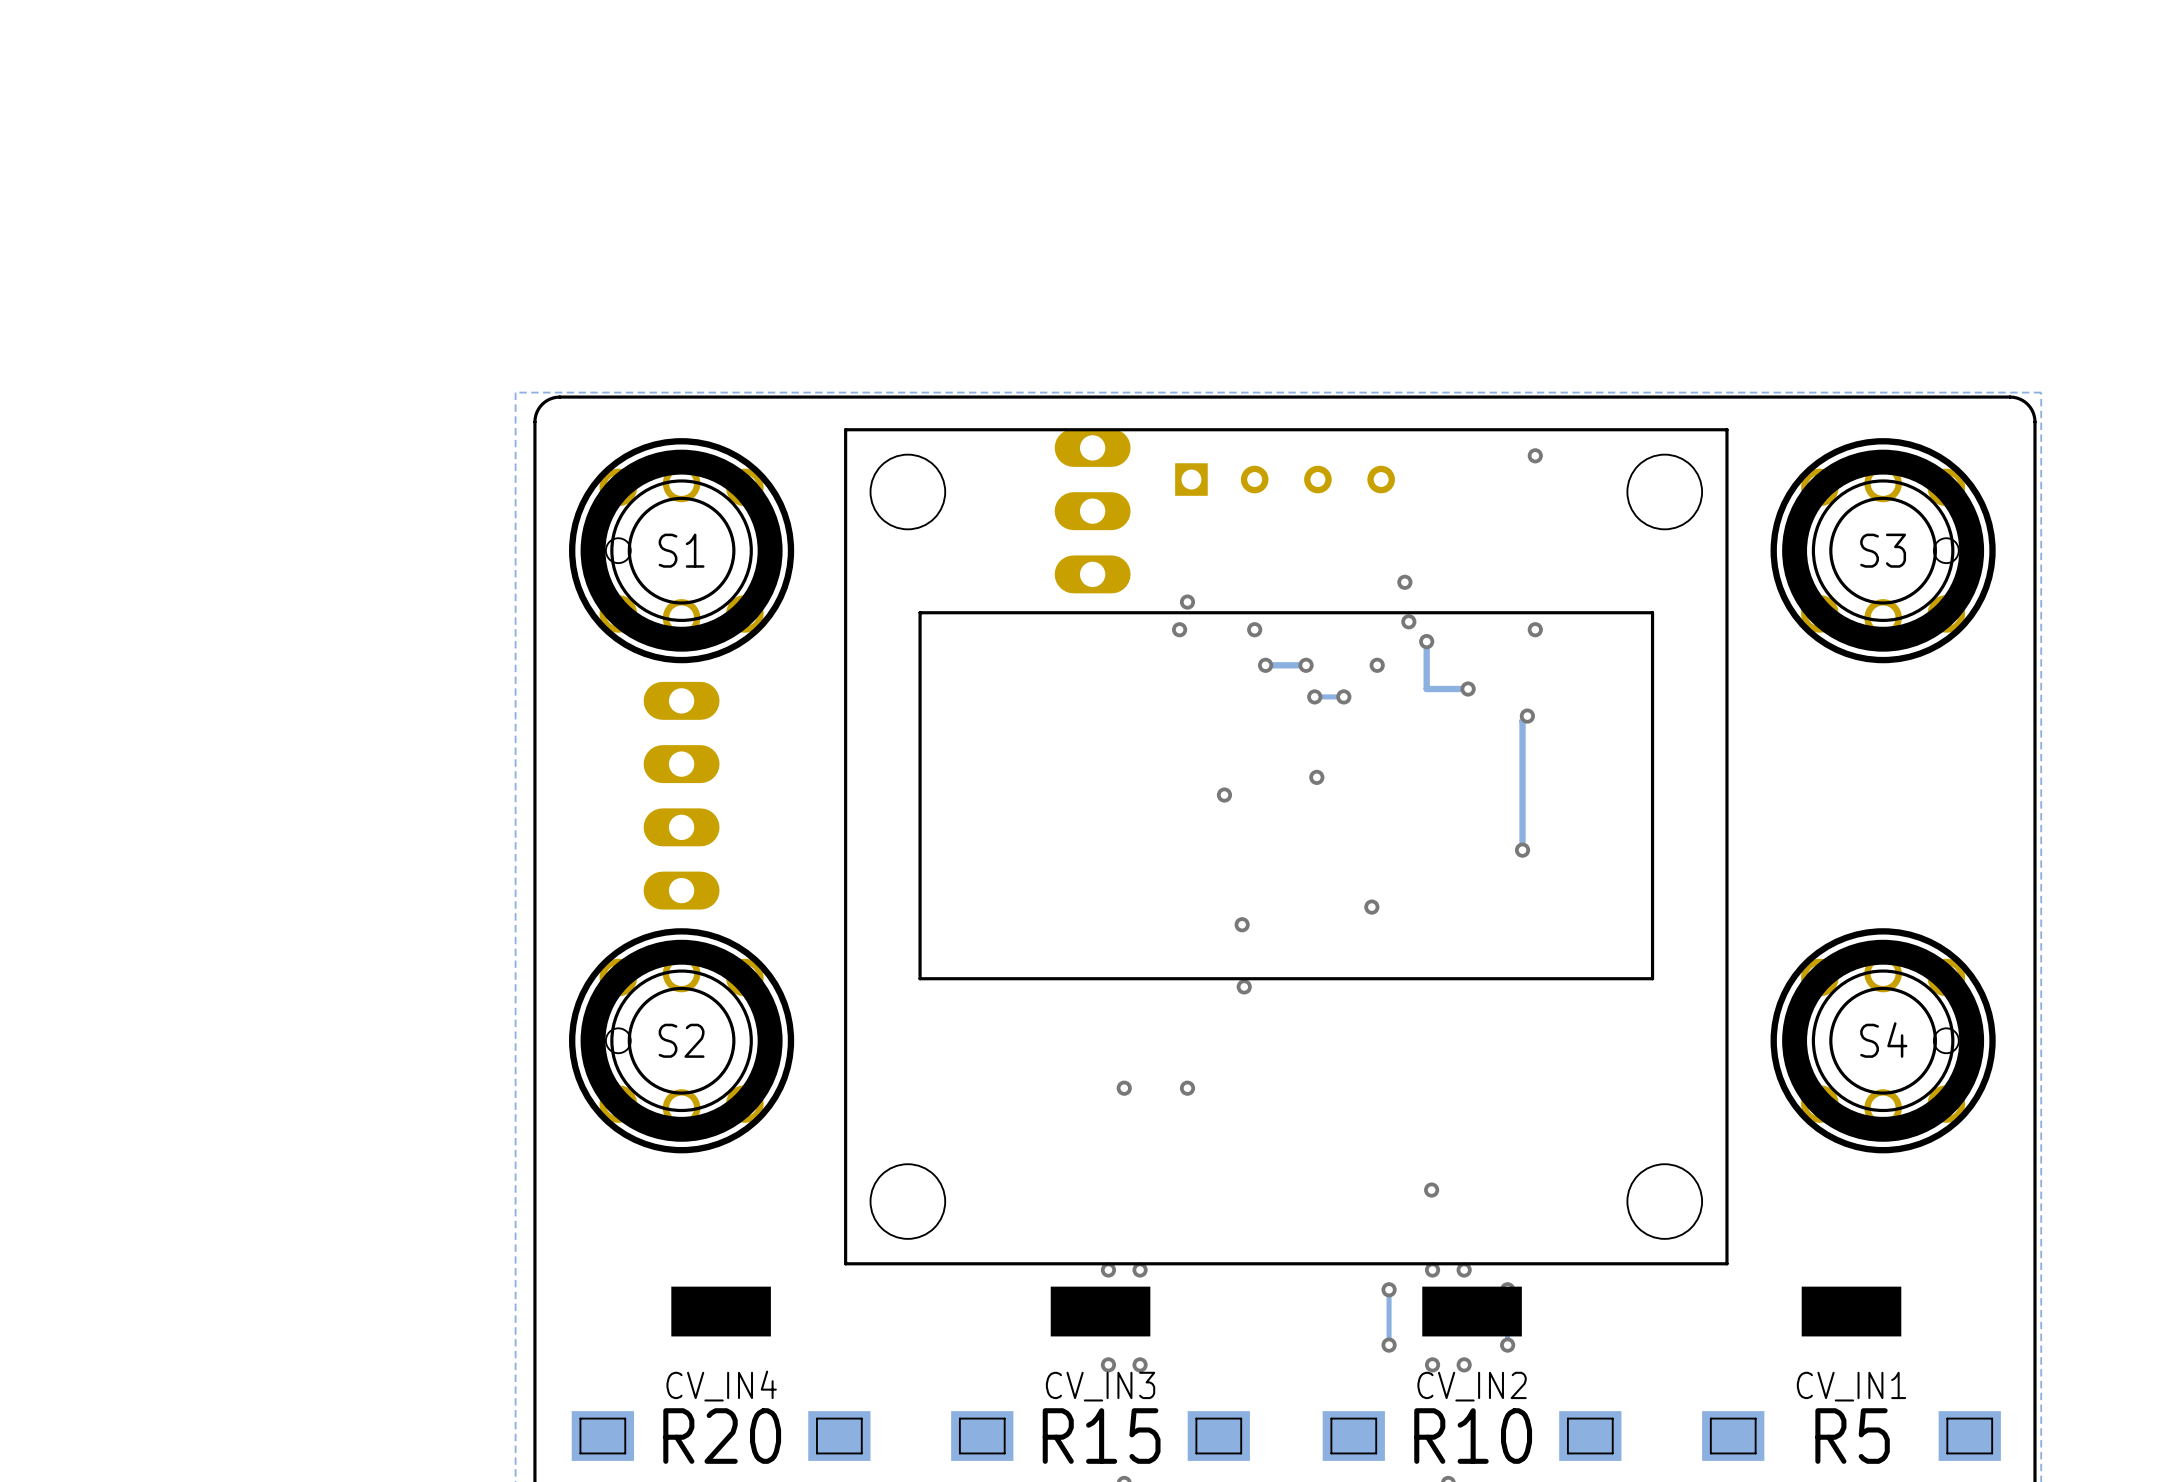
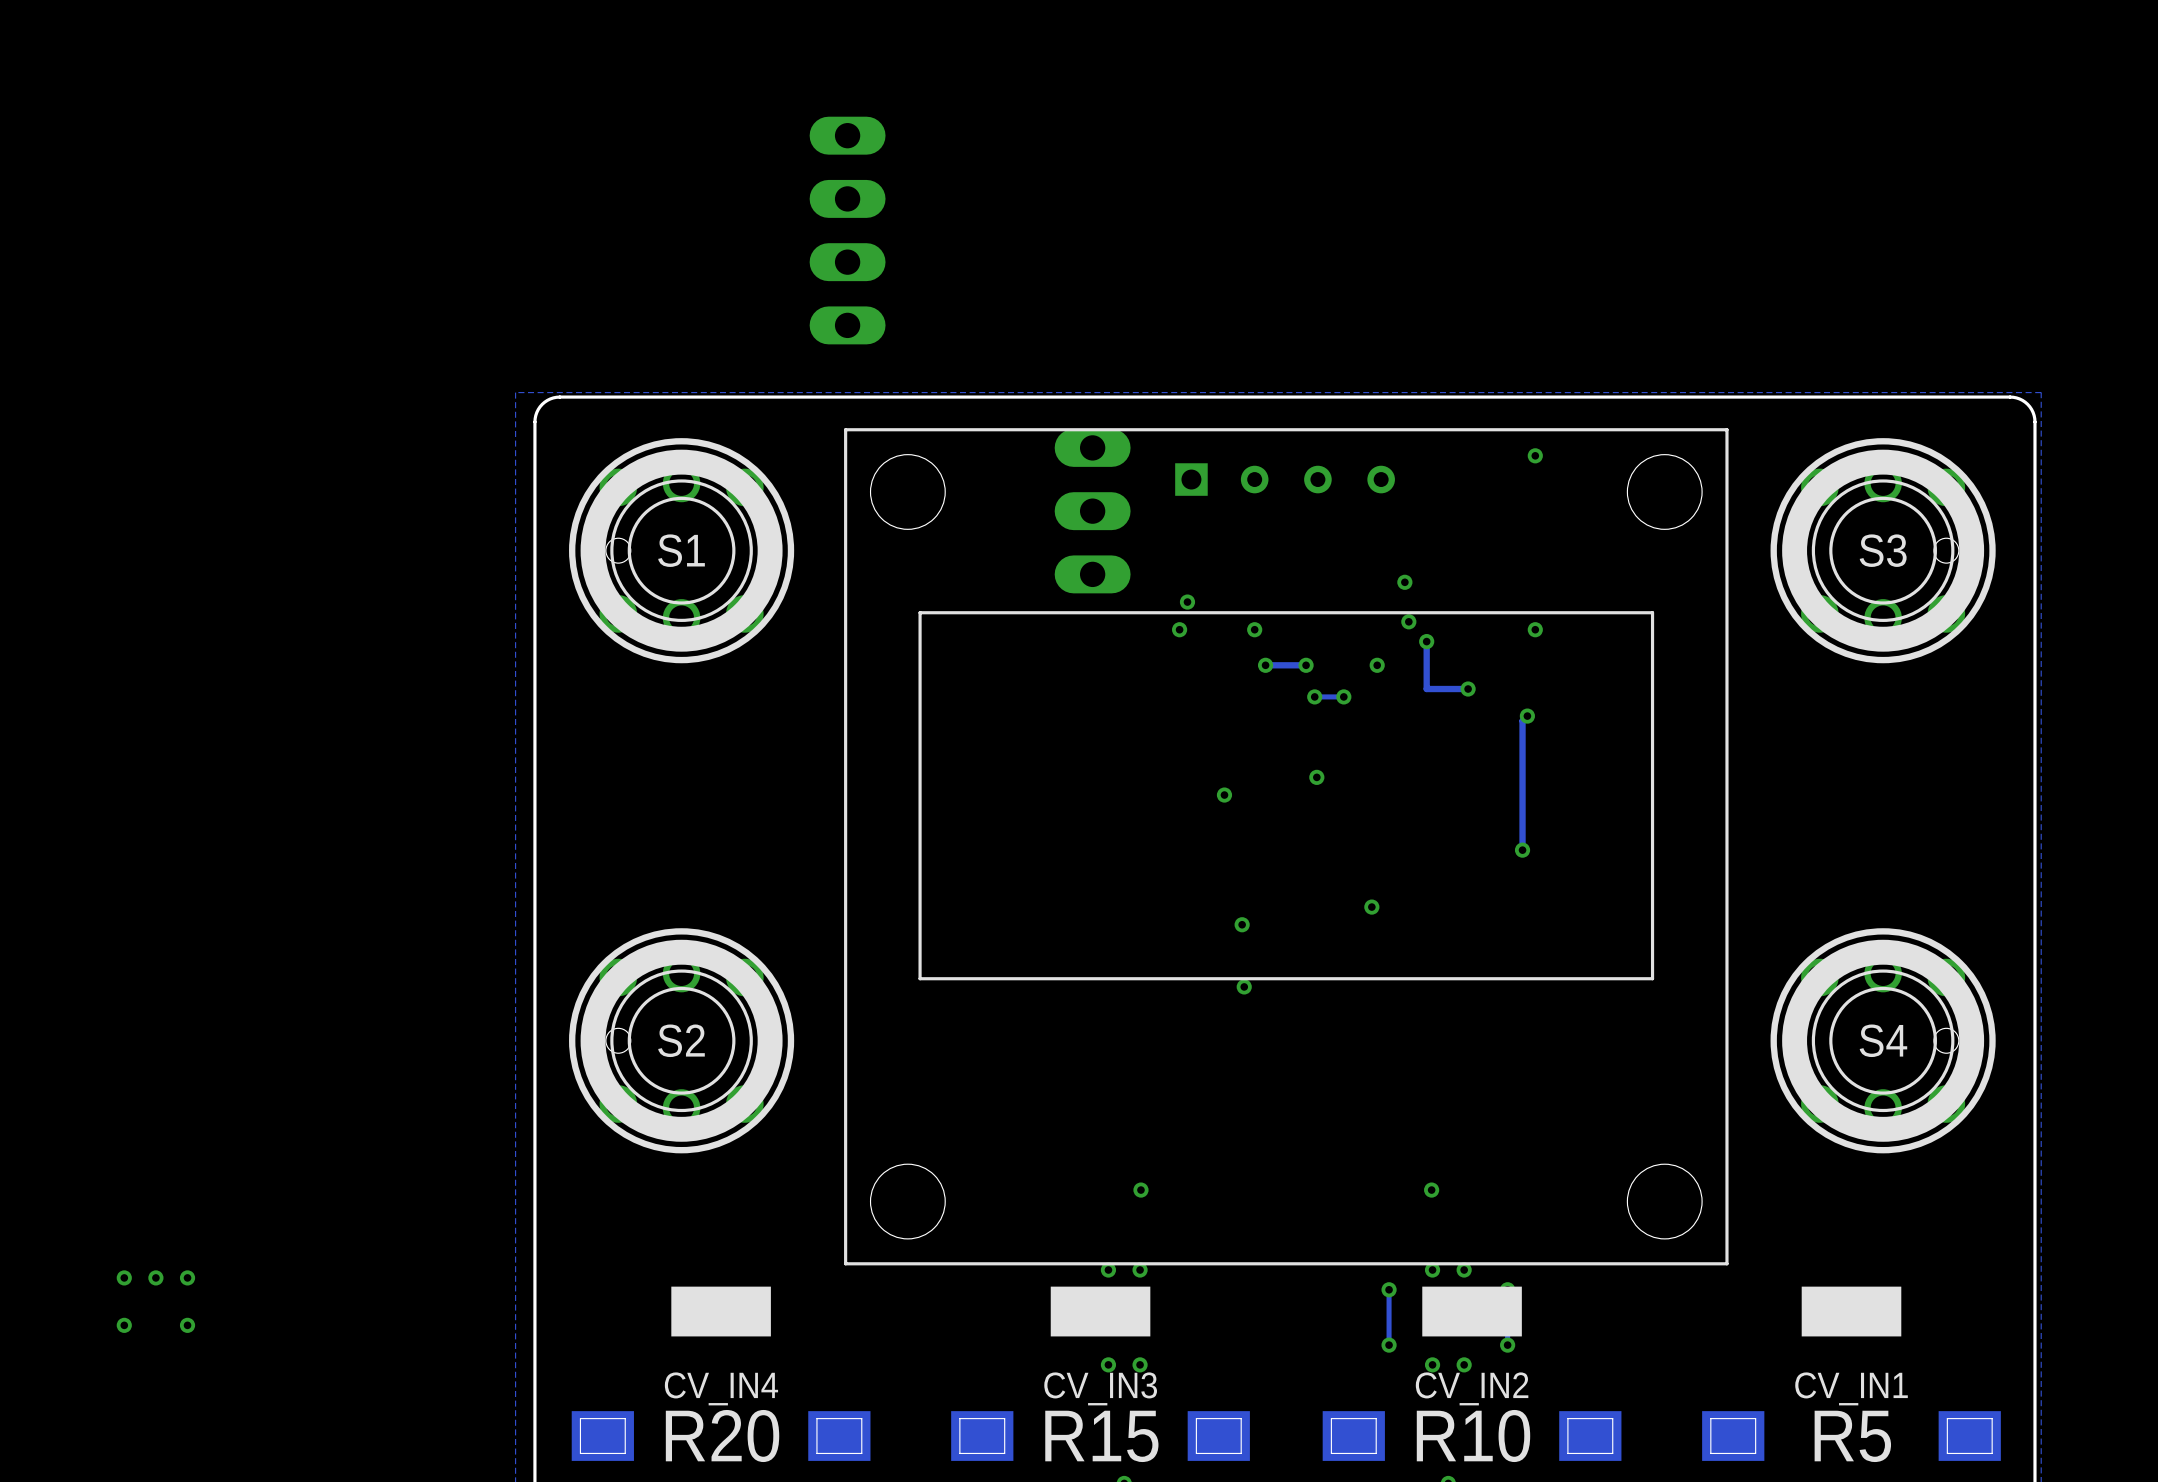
part position: (681, 795) -> (847, 230)
via: (1124, 1088) -> none
via: (1187, 1088) -> none
via: none -> (1140, 1190)
via: none -> (124, 1277)
via: none -> (155, 1277)
via: none -> (187, 1277)
via: none -> (124, 1325)
via: none -> (187, 1325)

